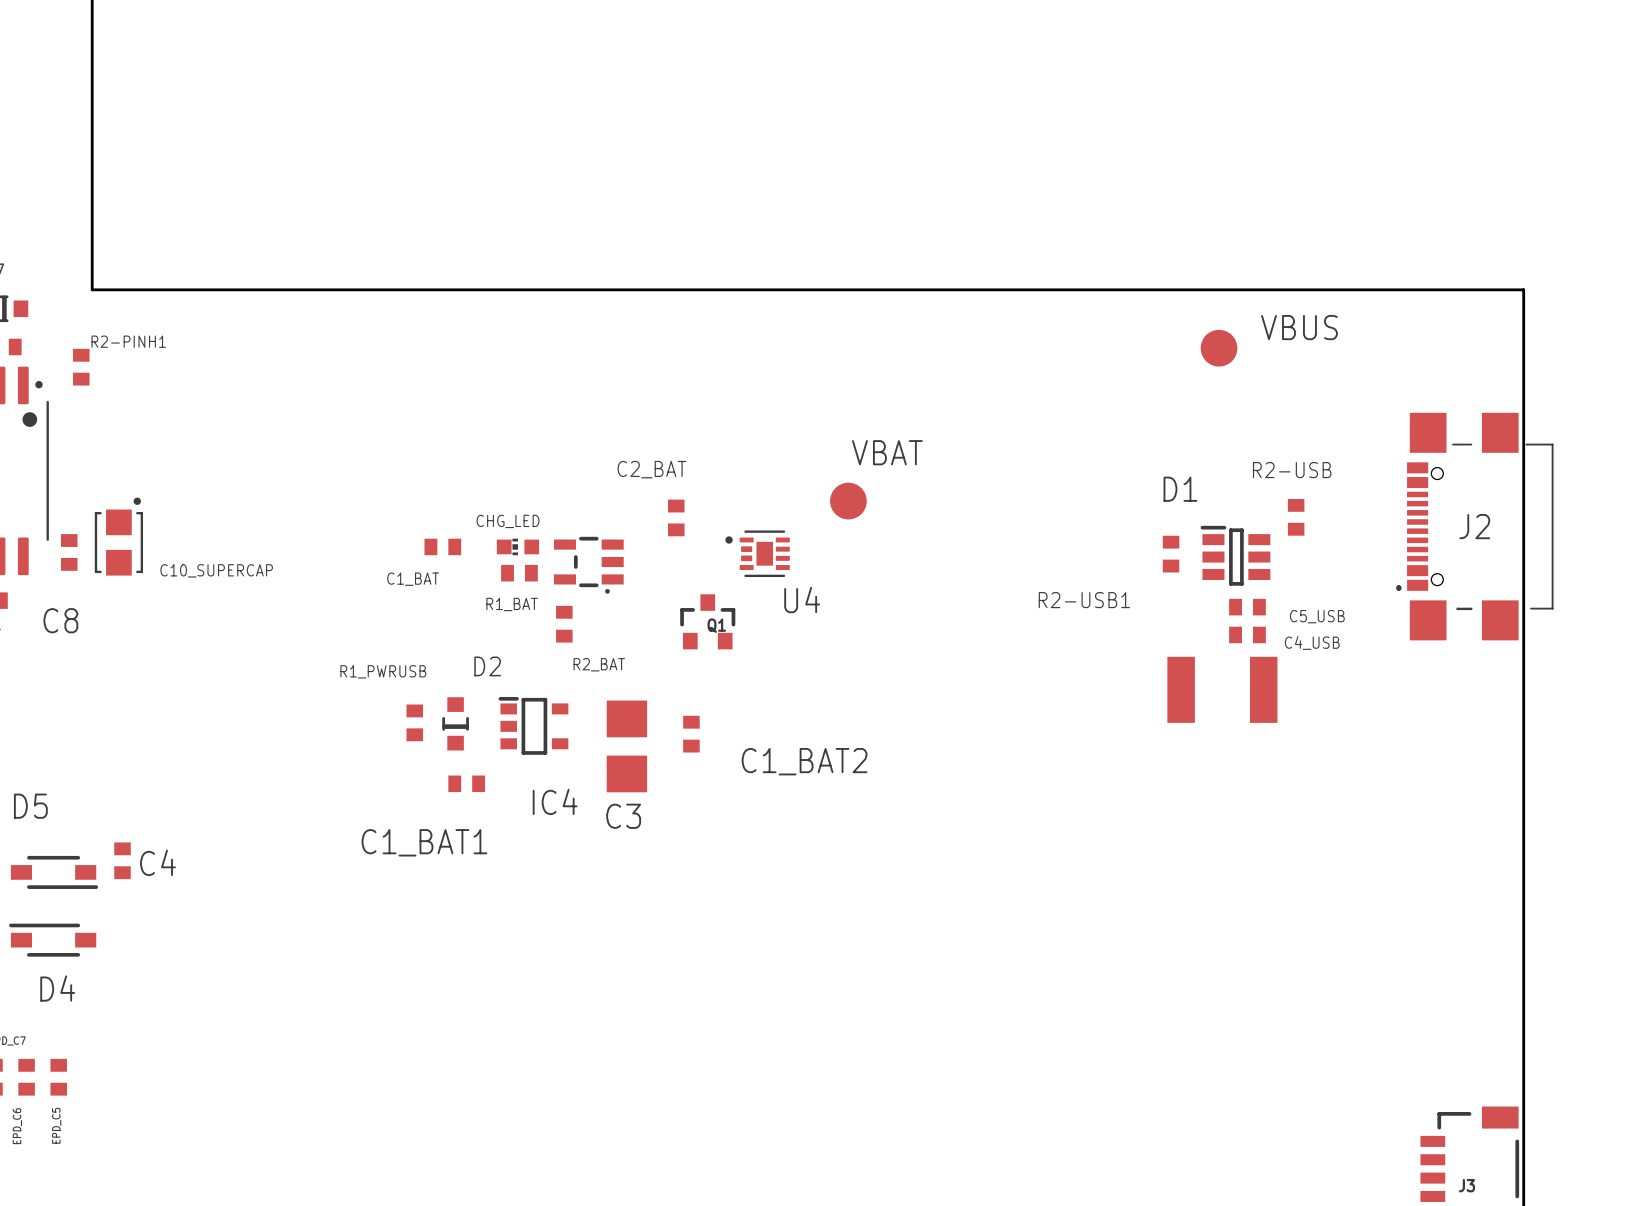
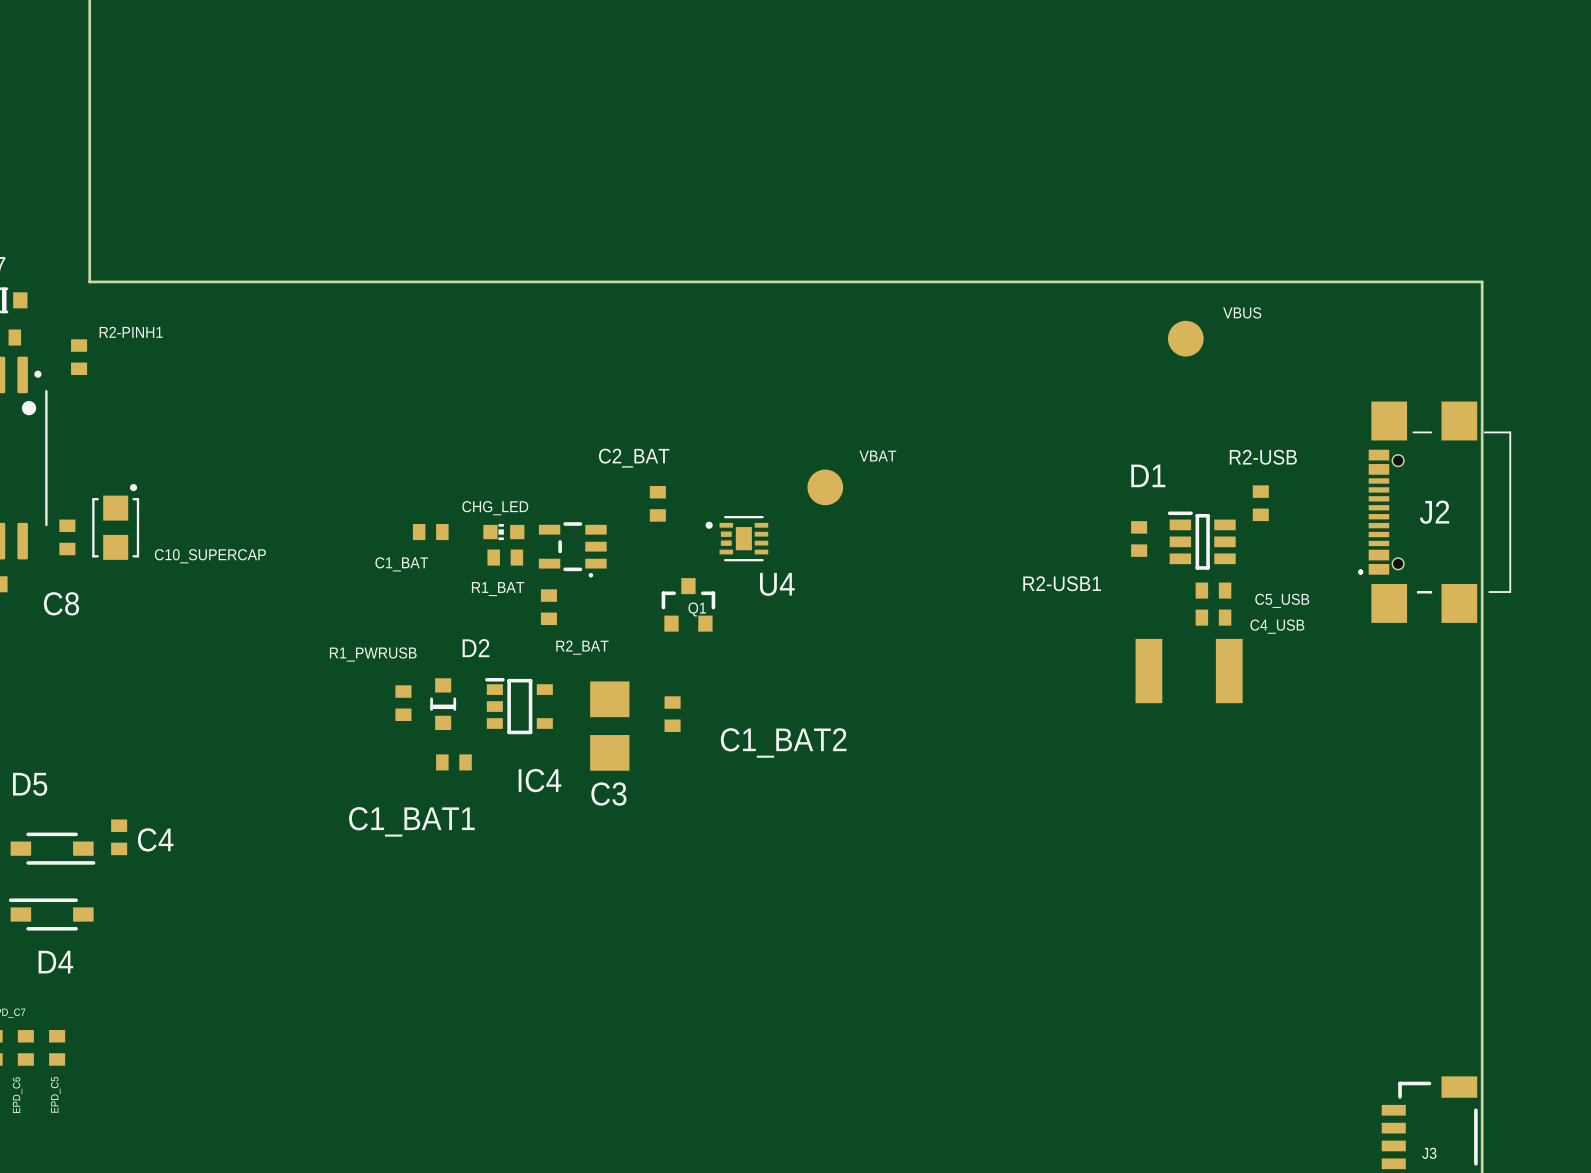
text: none -> VBUS (1242, 312)
VBUS name: VBUS (1299, 327) -> none
VBAT name: VBAT (887, 452) -> none
text: none -> VBAT (877, 456)

